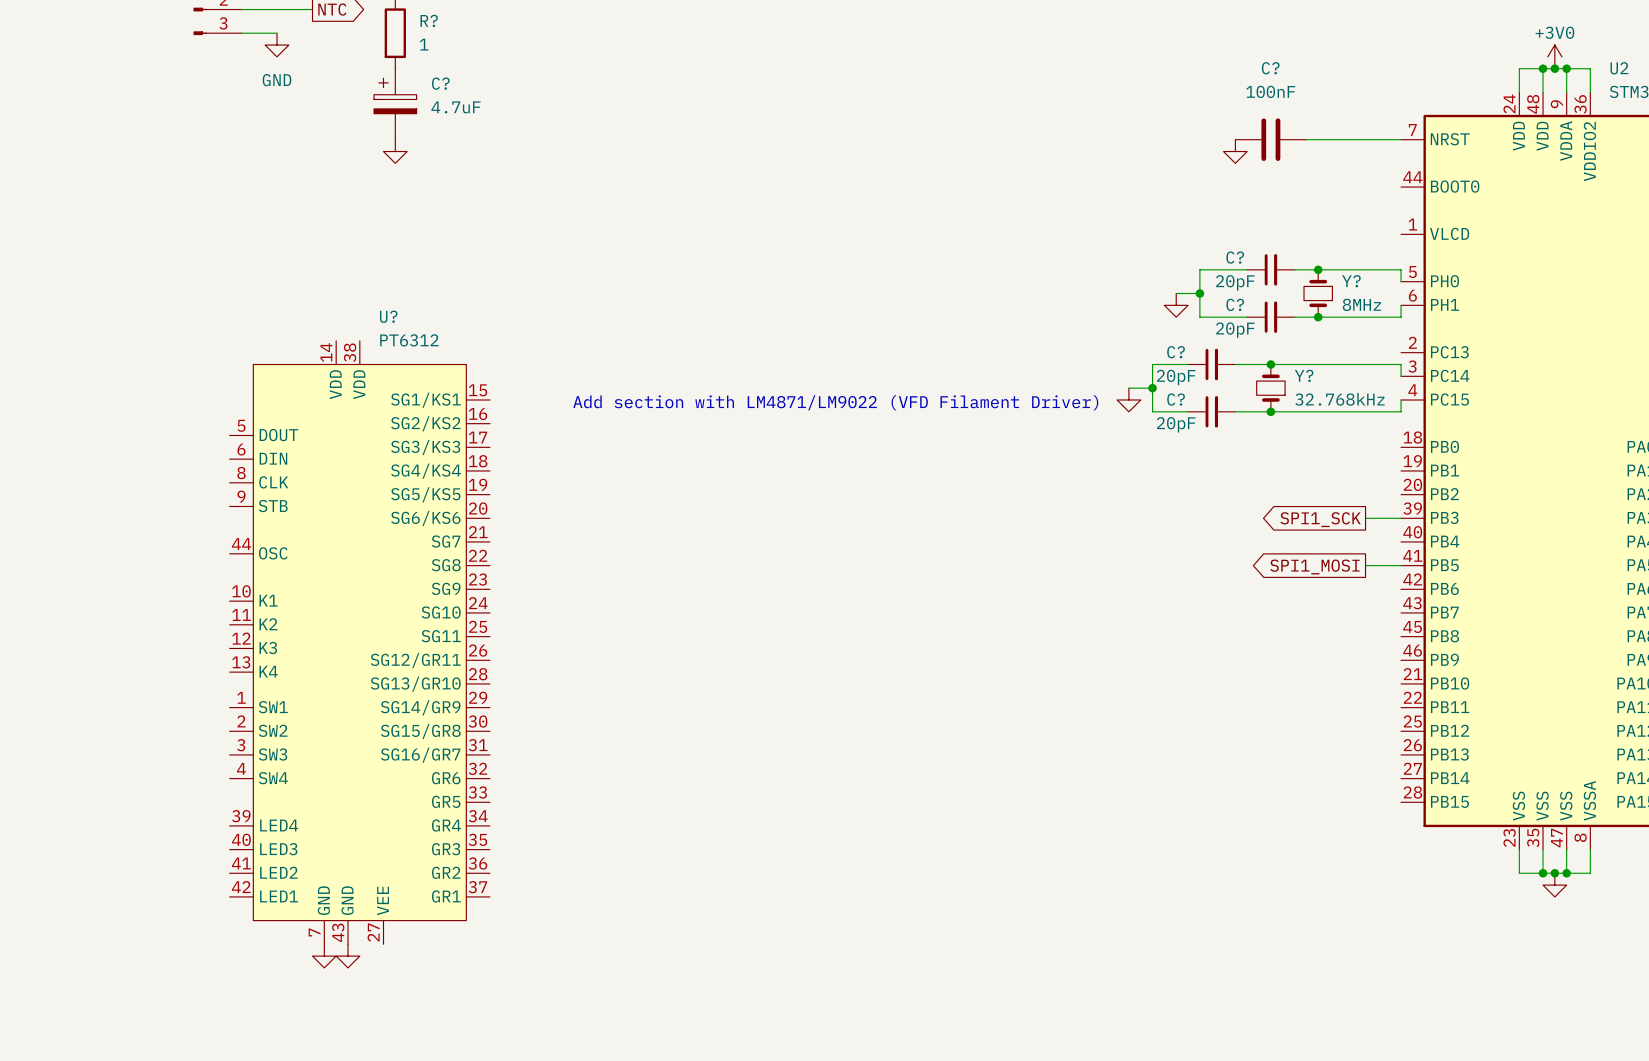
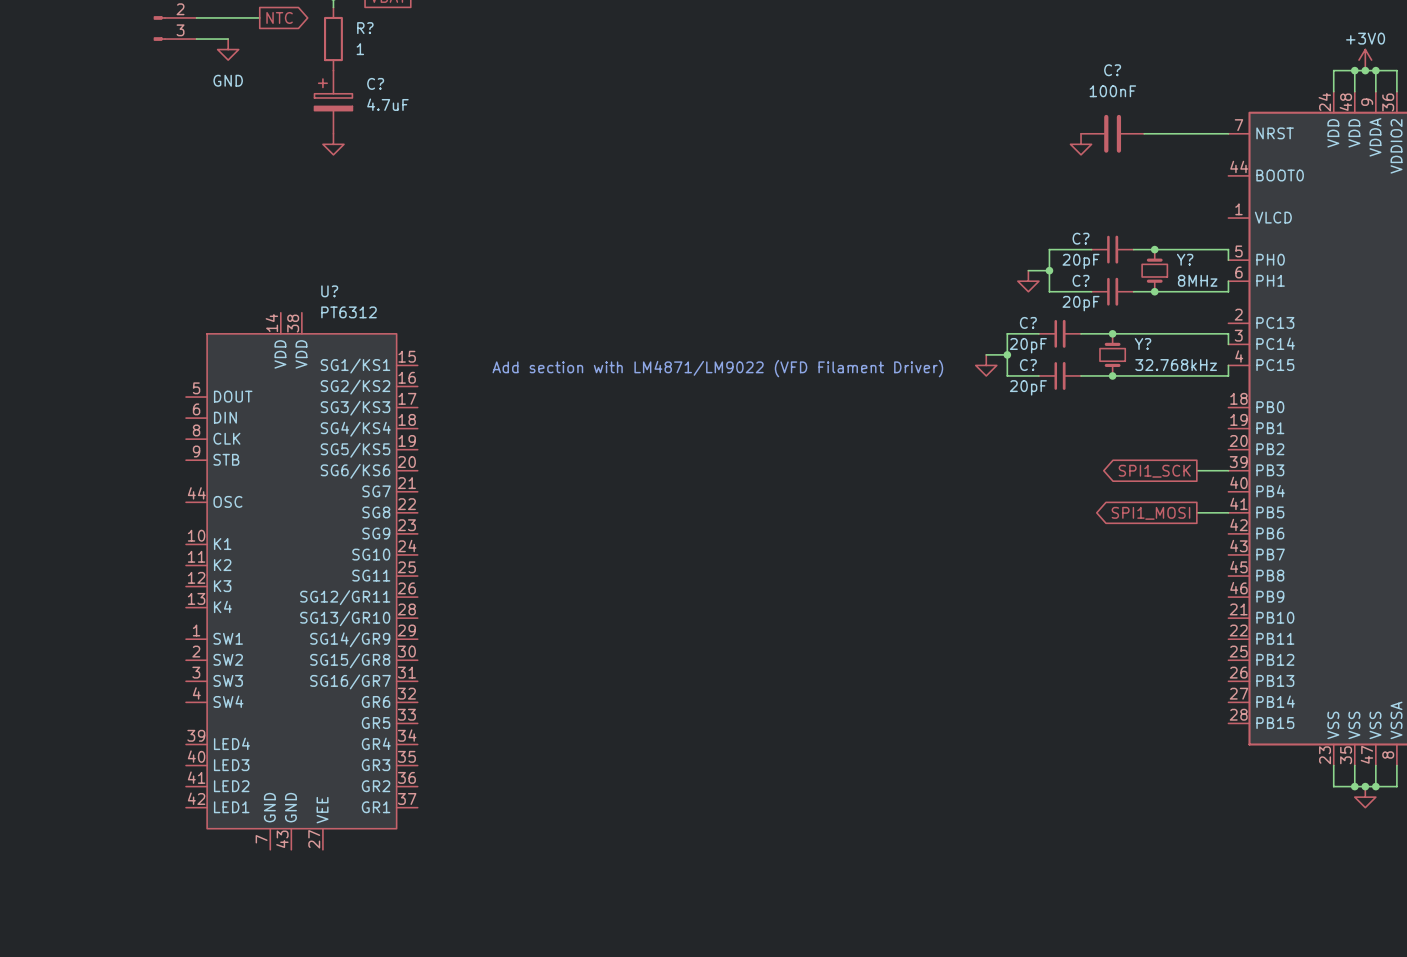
power symbol: (324, 956) -> none
power symbol: (348, 956) -> none

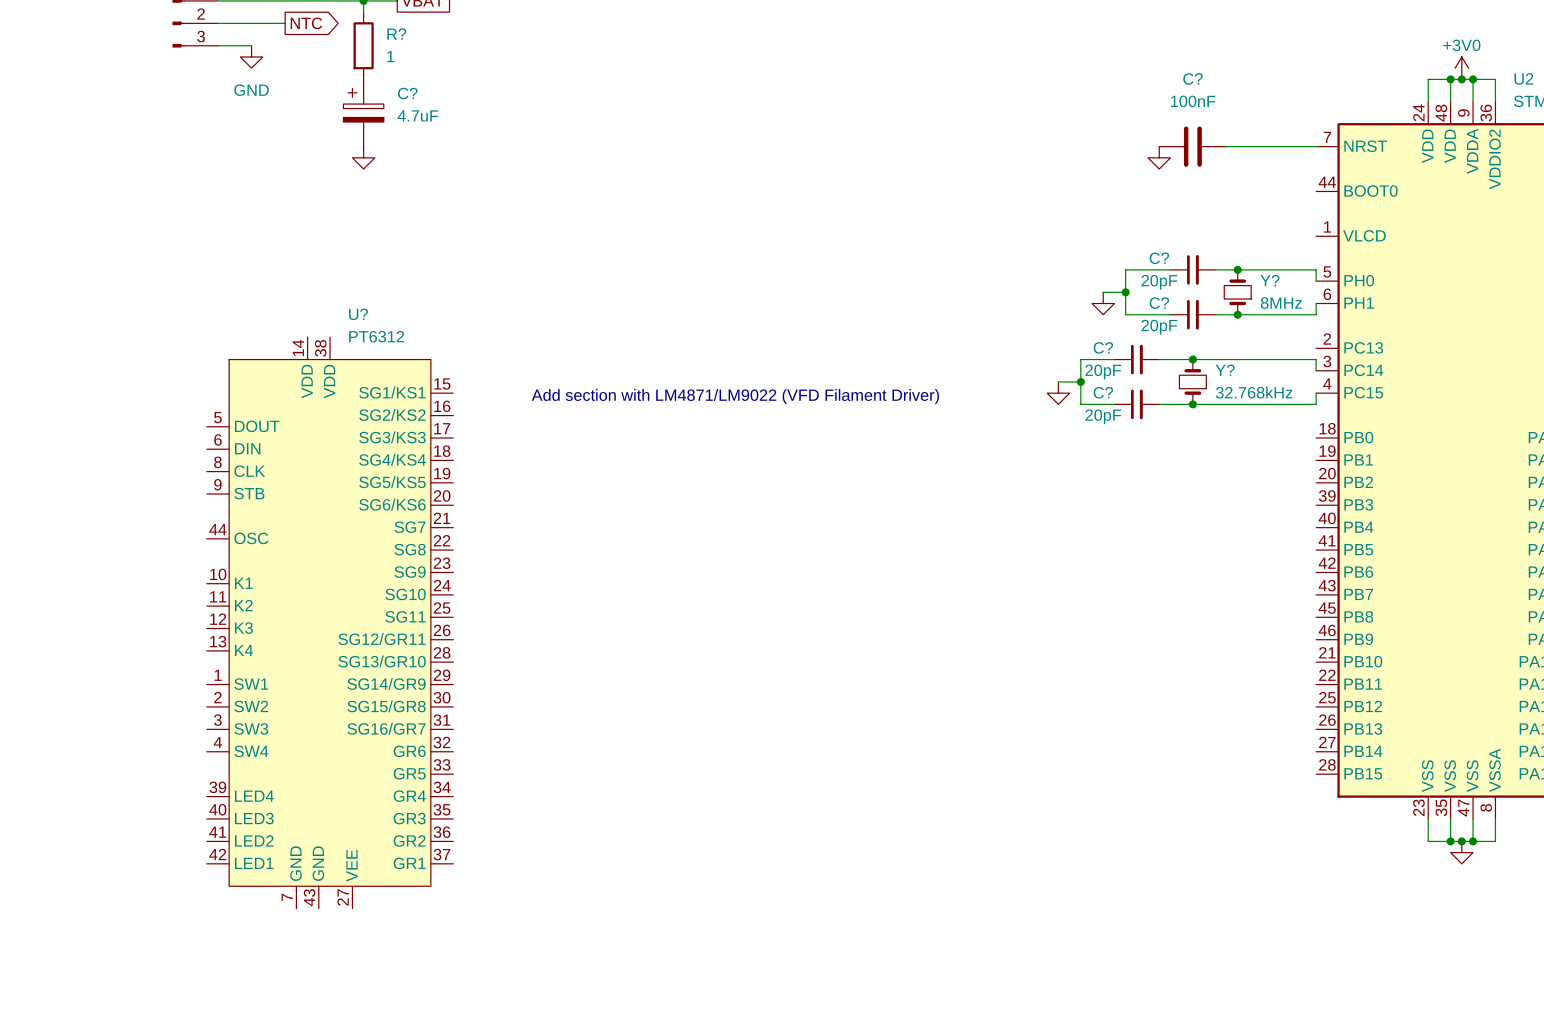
wire: (1196, 470) (1228, 470) -> none
global label: SPI1_SCK (1154, 471) -> none
wire: (1196, 512) (1228, 512) -> none
global label: SPI1_MOSI (1150, 513) -> none

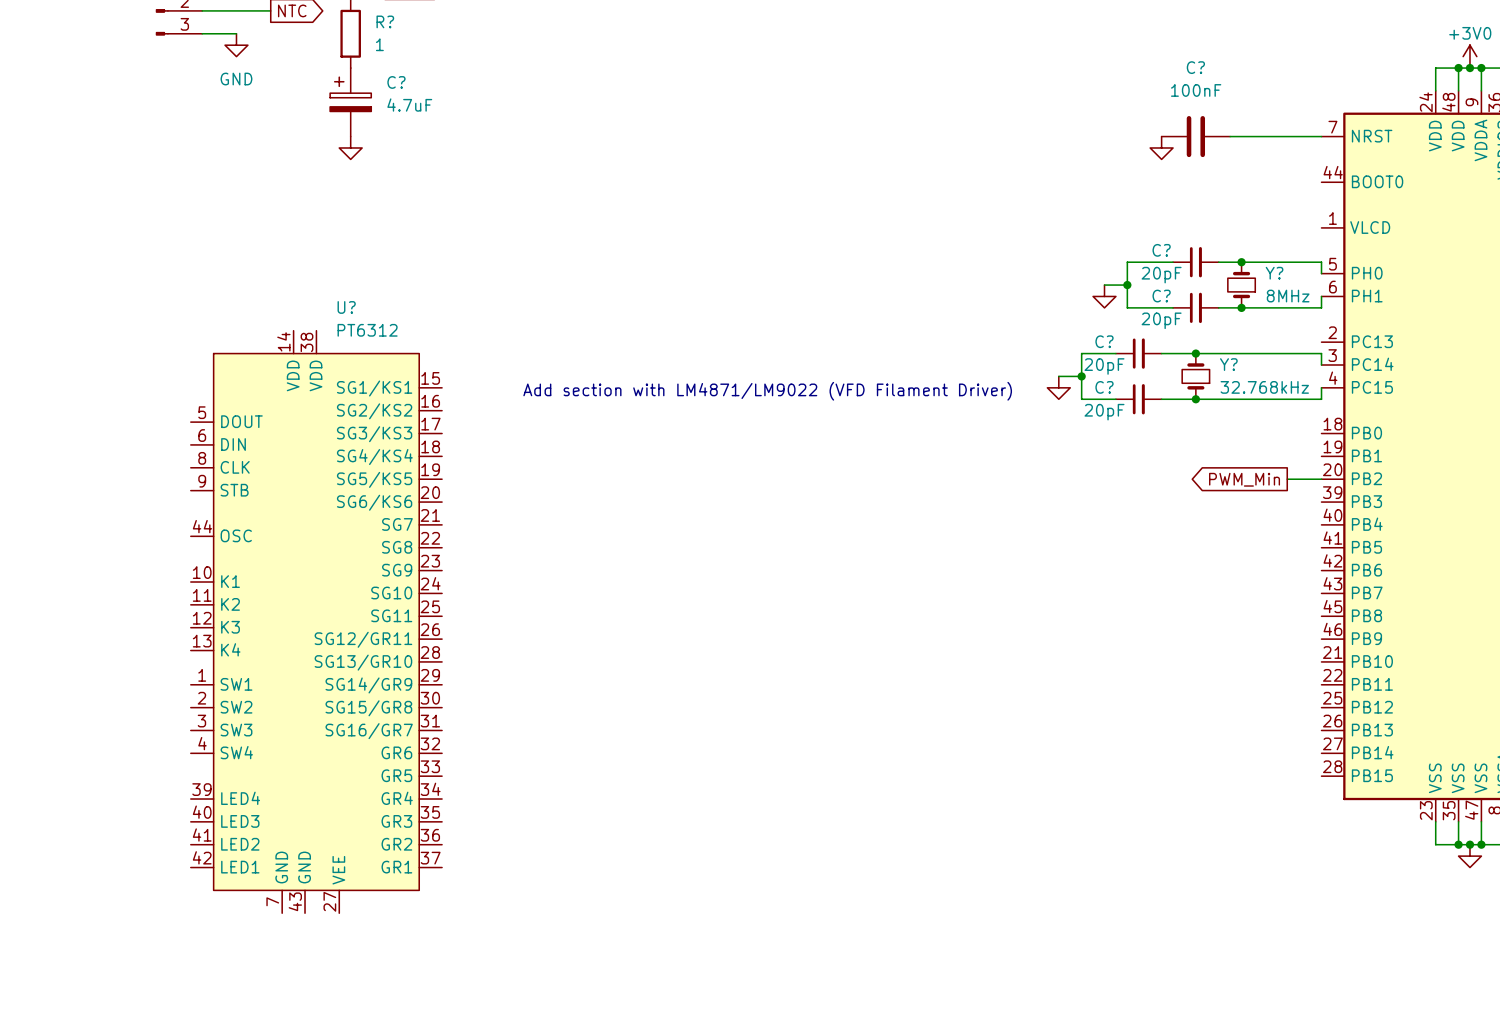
wire: none -> (1287, 479) (1321, 479)
global label: none -> PWM_Min (1244, 479)

